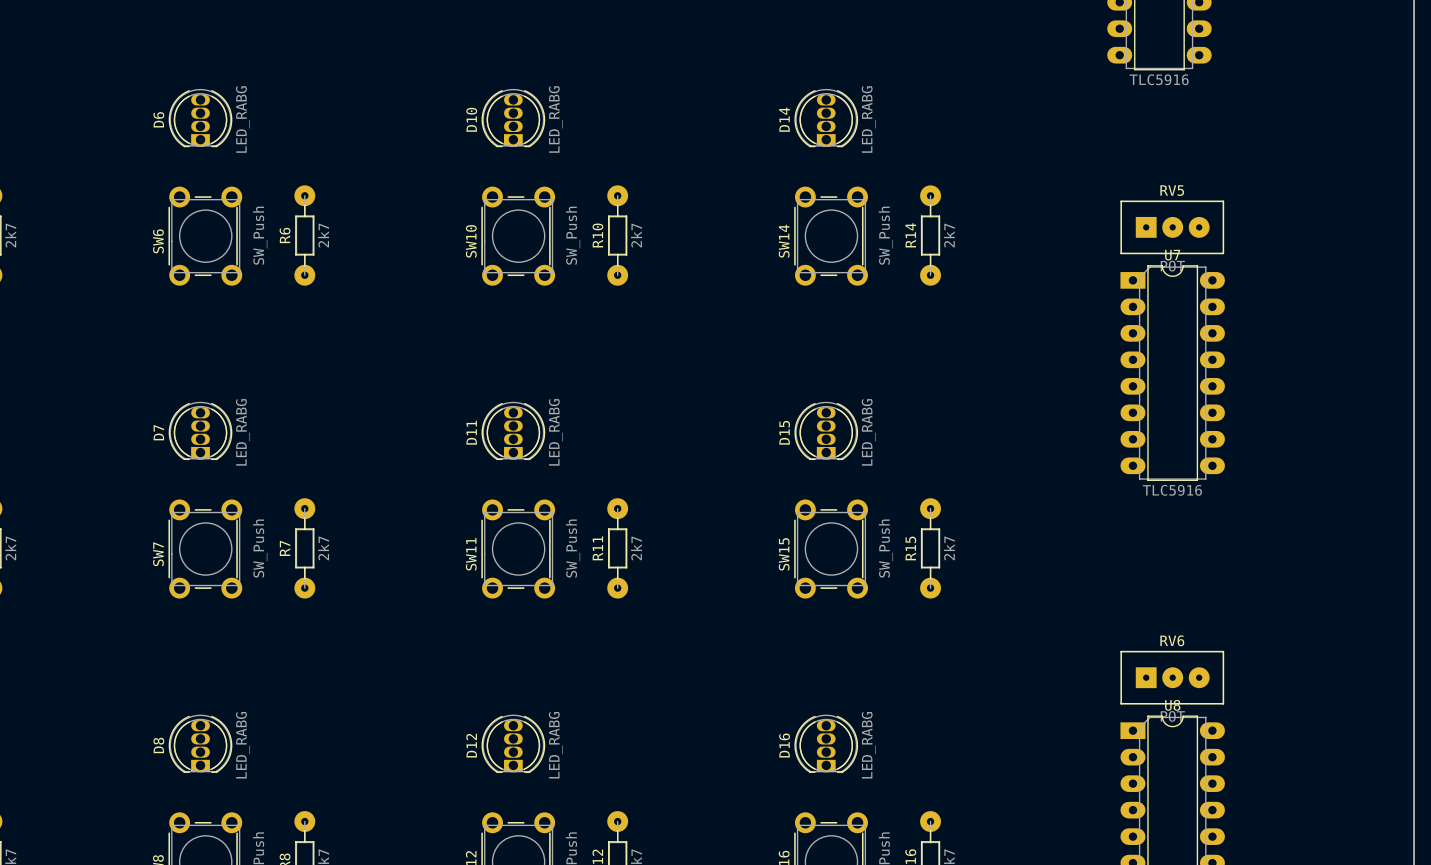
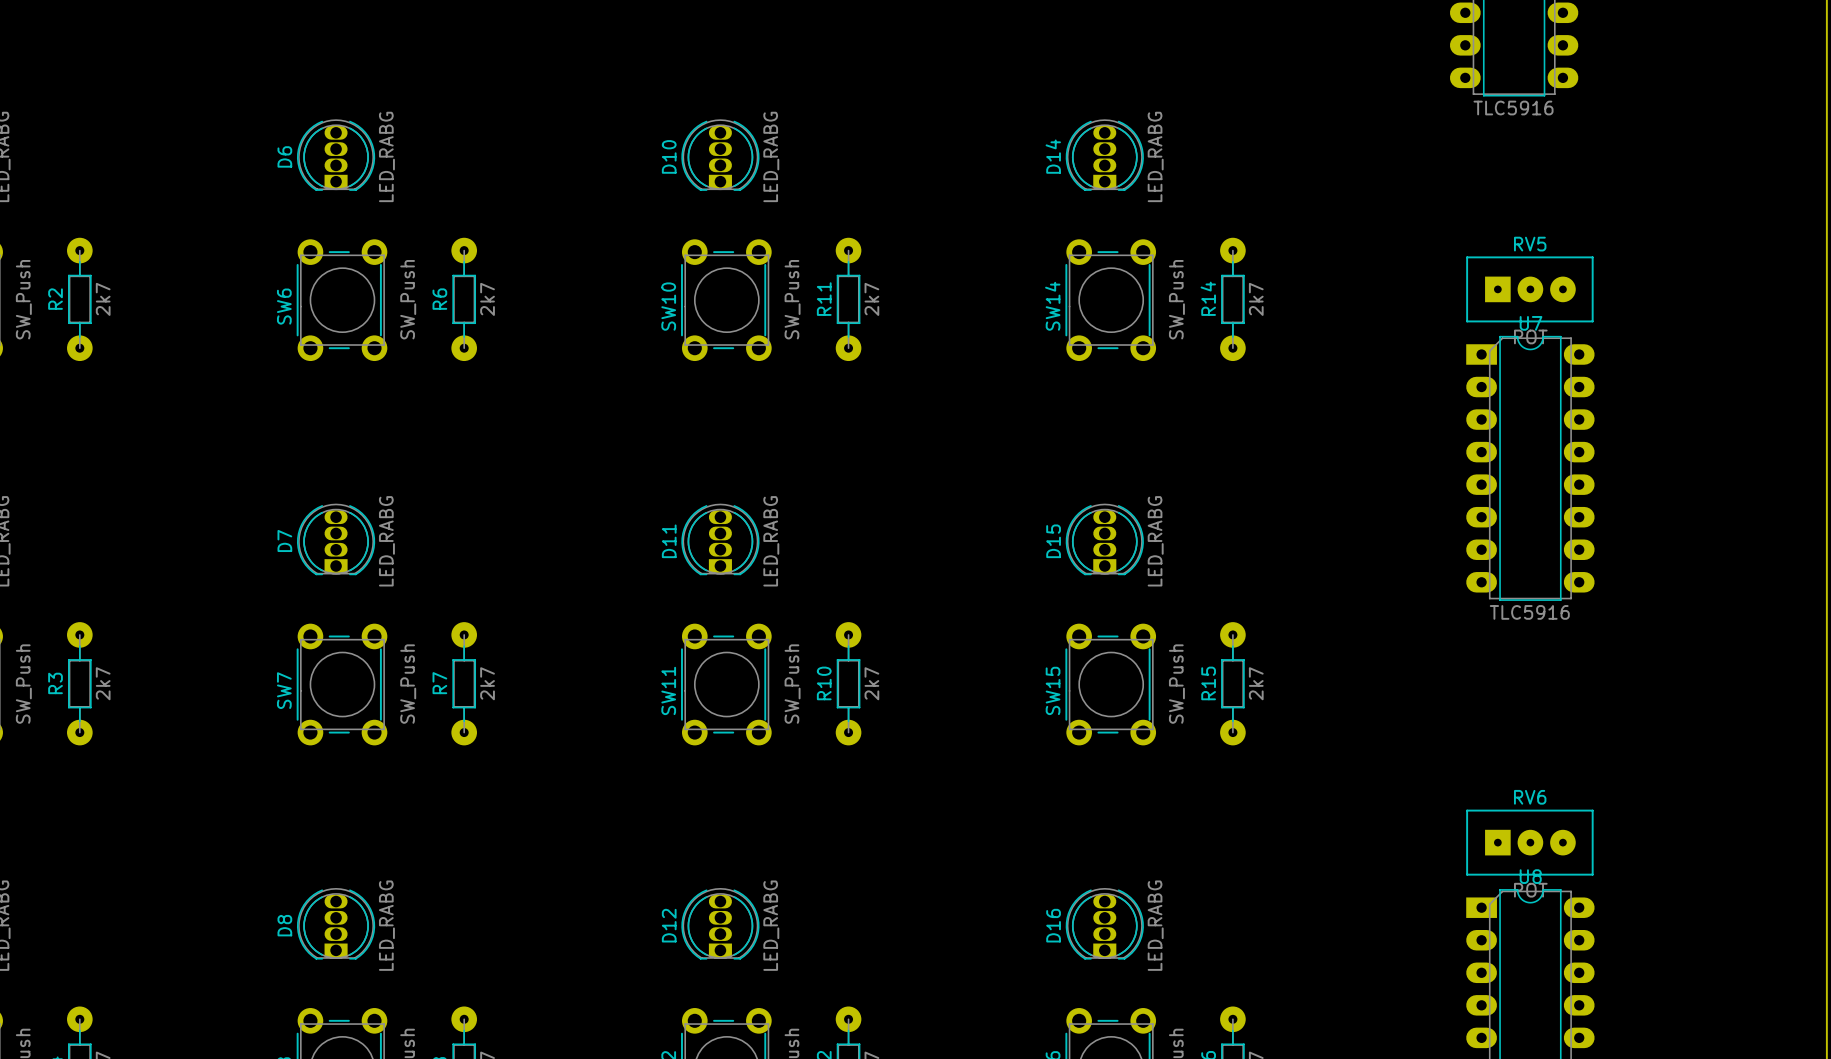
R10 name: R10 (597, 235) -> R11 (824, 299)
R11 name: R11 (597, 548) -> R10 (824, 683)

